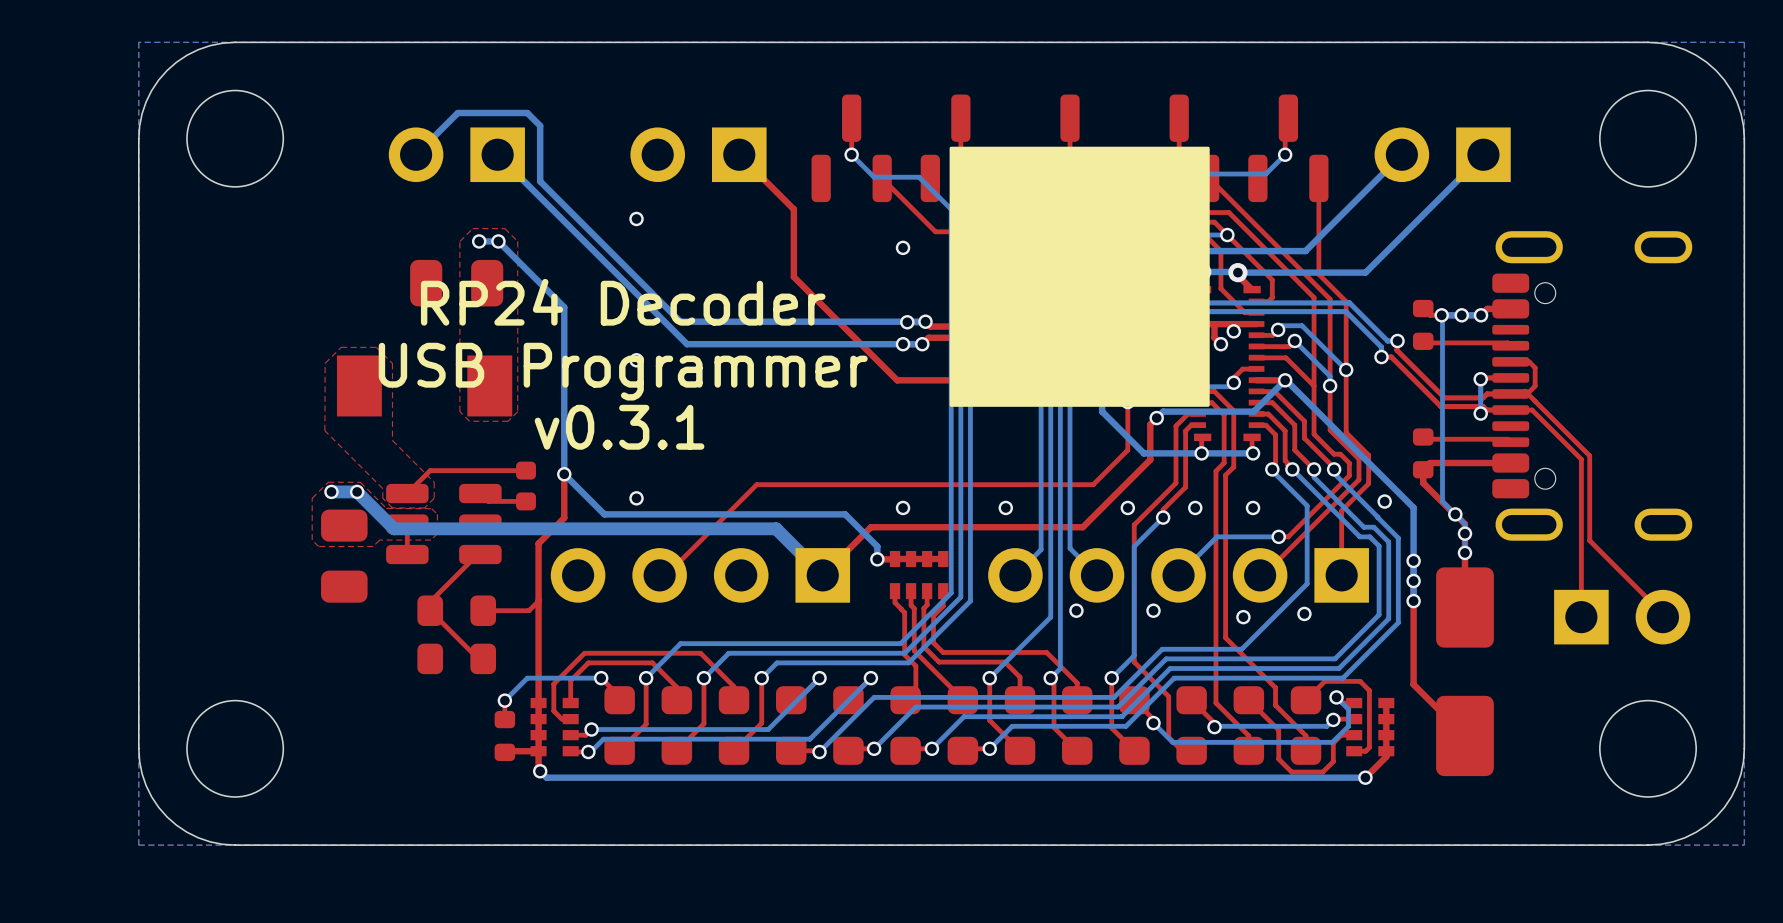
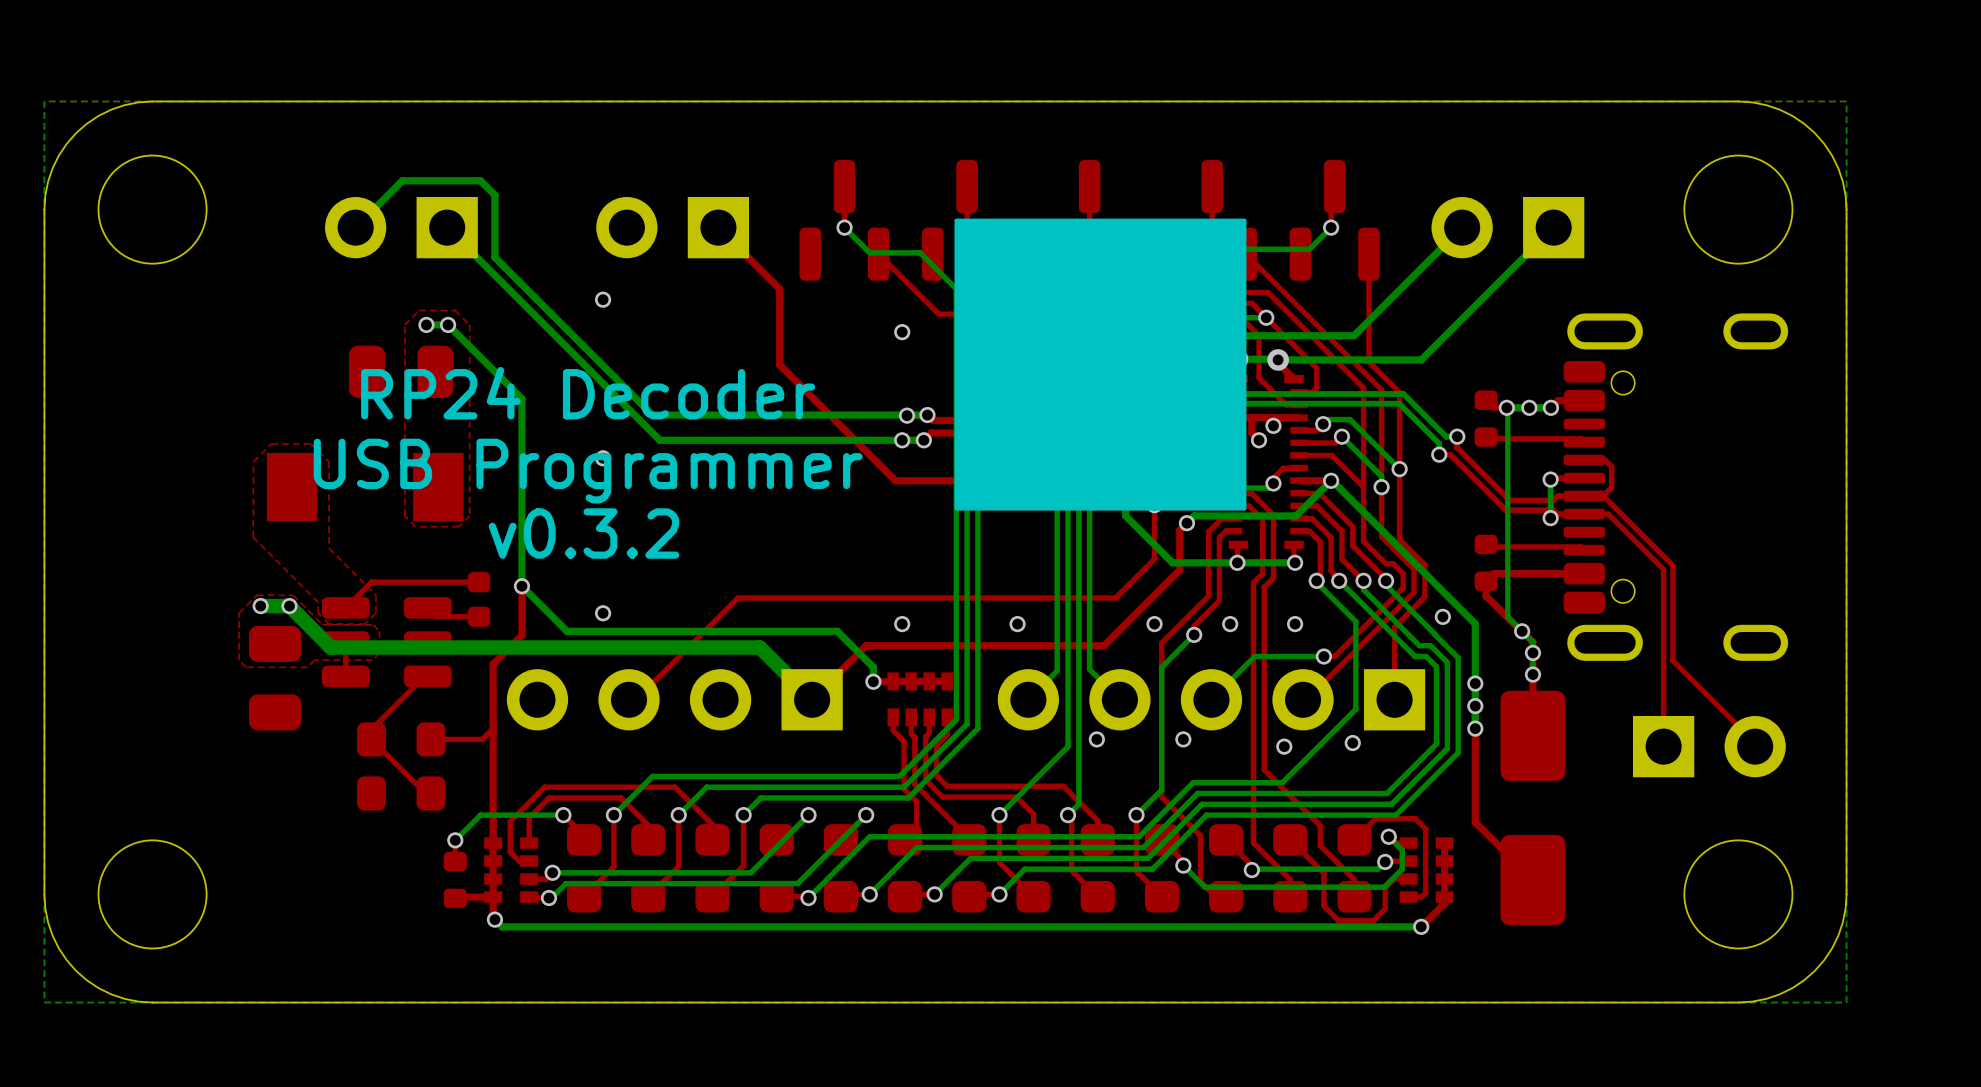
text: v0.3.1 (619, 427) -> v0.3.2 (584, 533)

